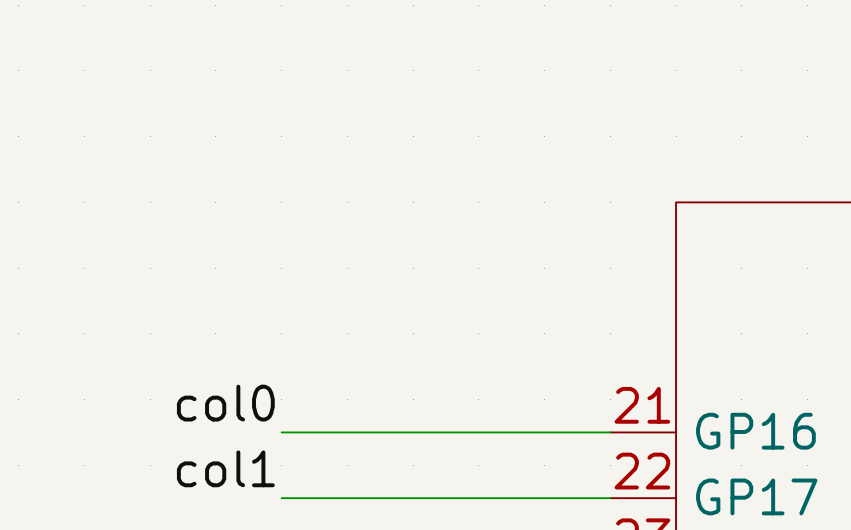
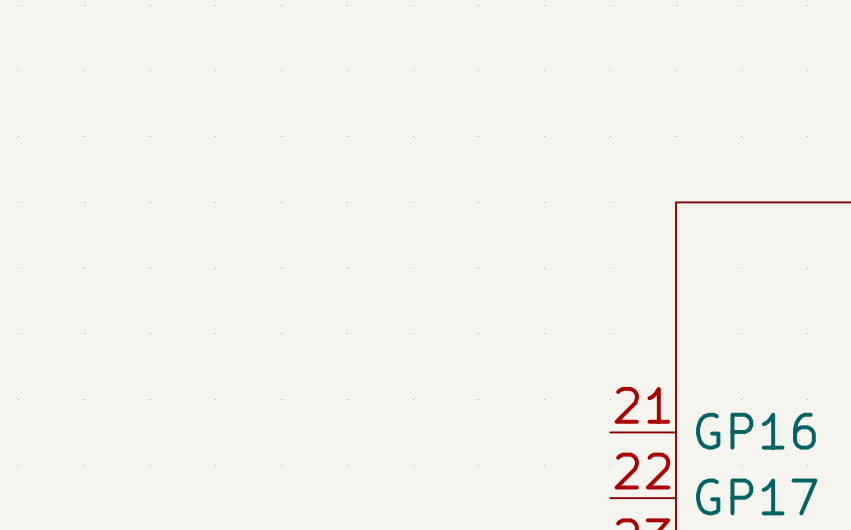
label: col0 (225, 403) -> none
wire: (281, 432) (610, 432) -> none
label: col1 (225, 468) -> none
wire: (281, 498) (610, 498) -> none

